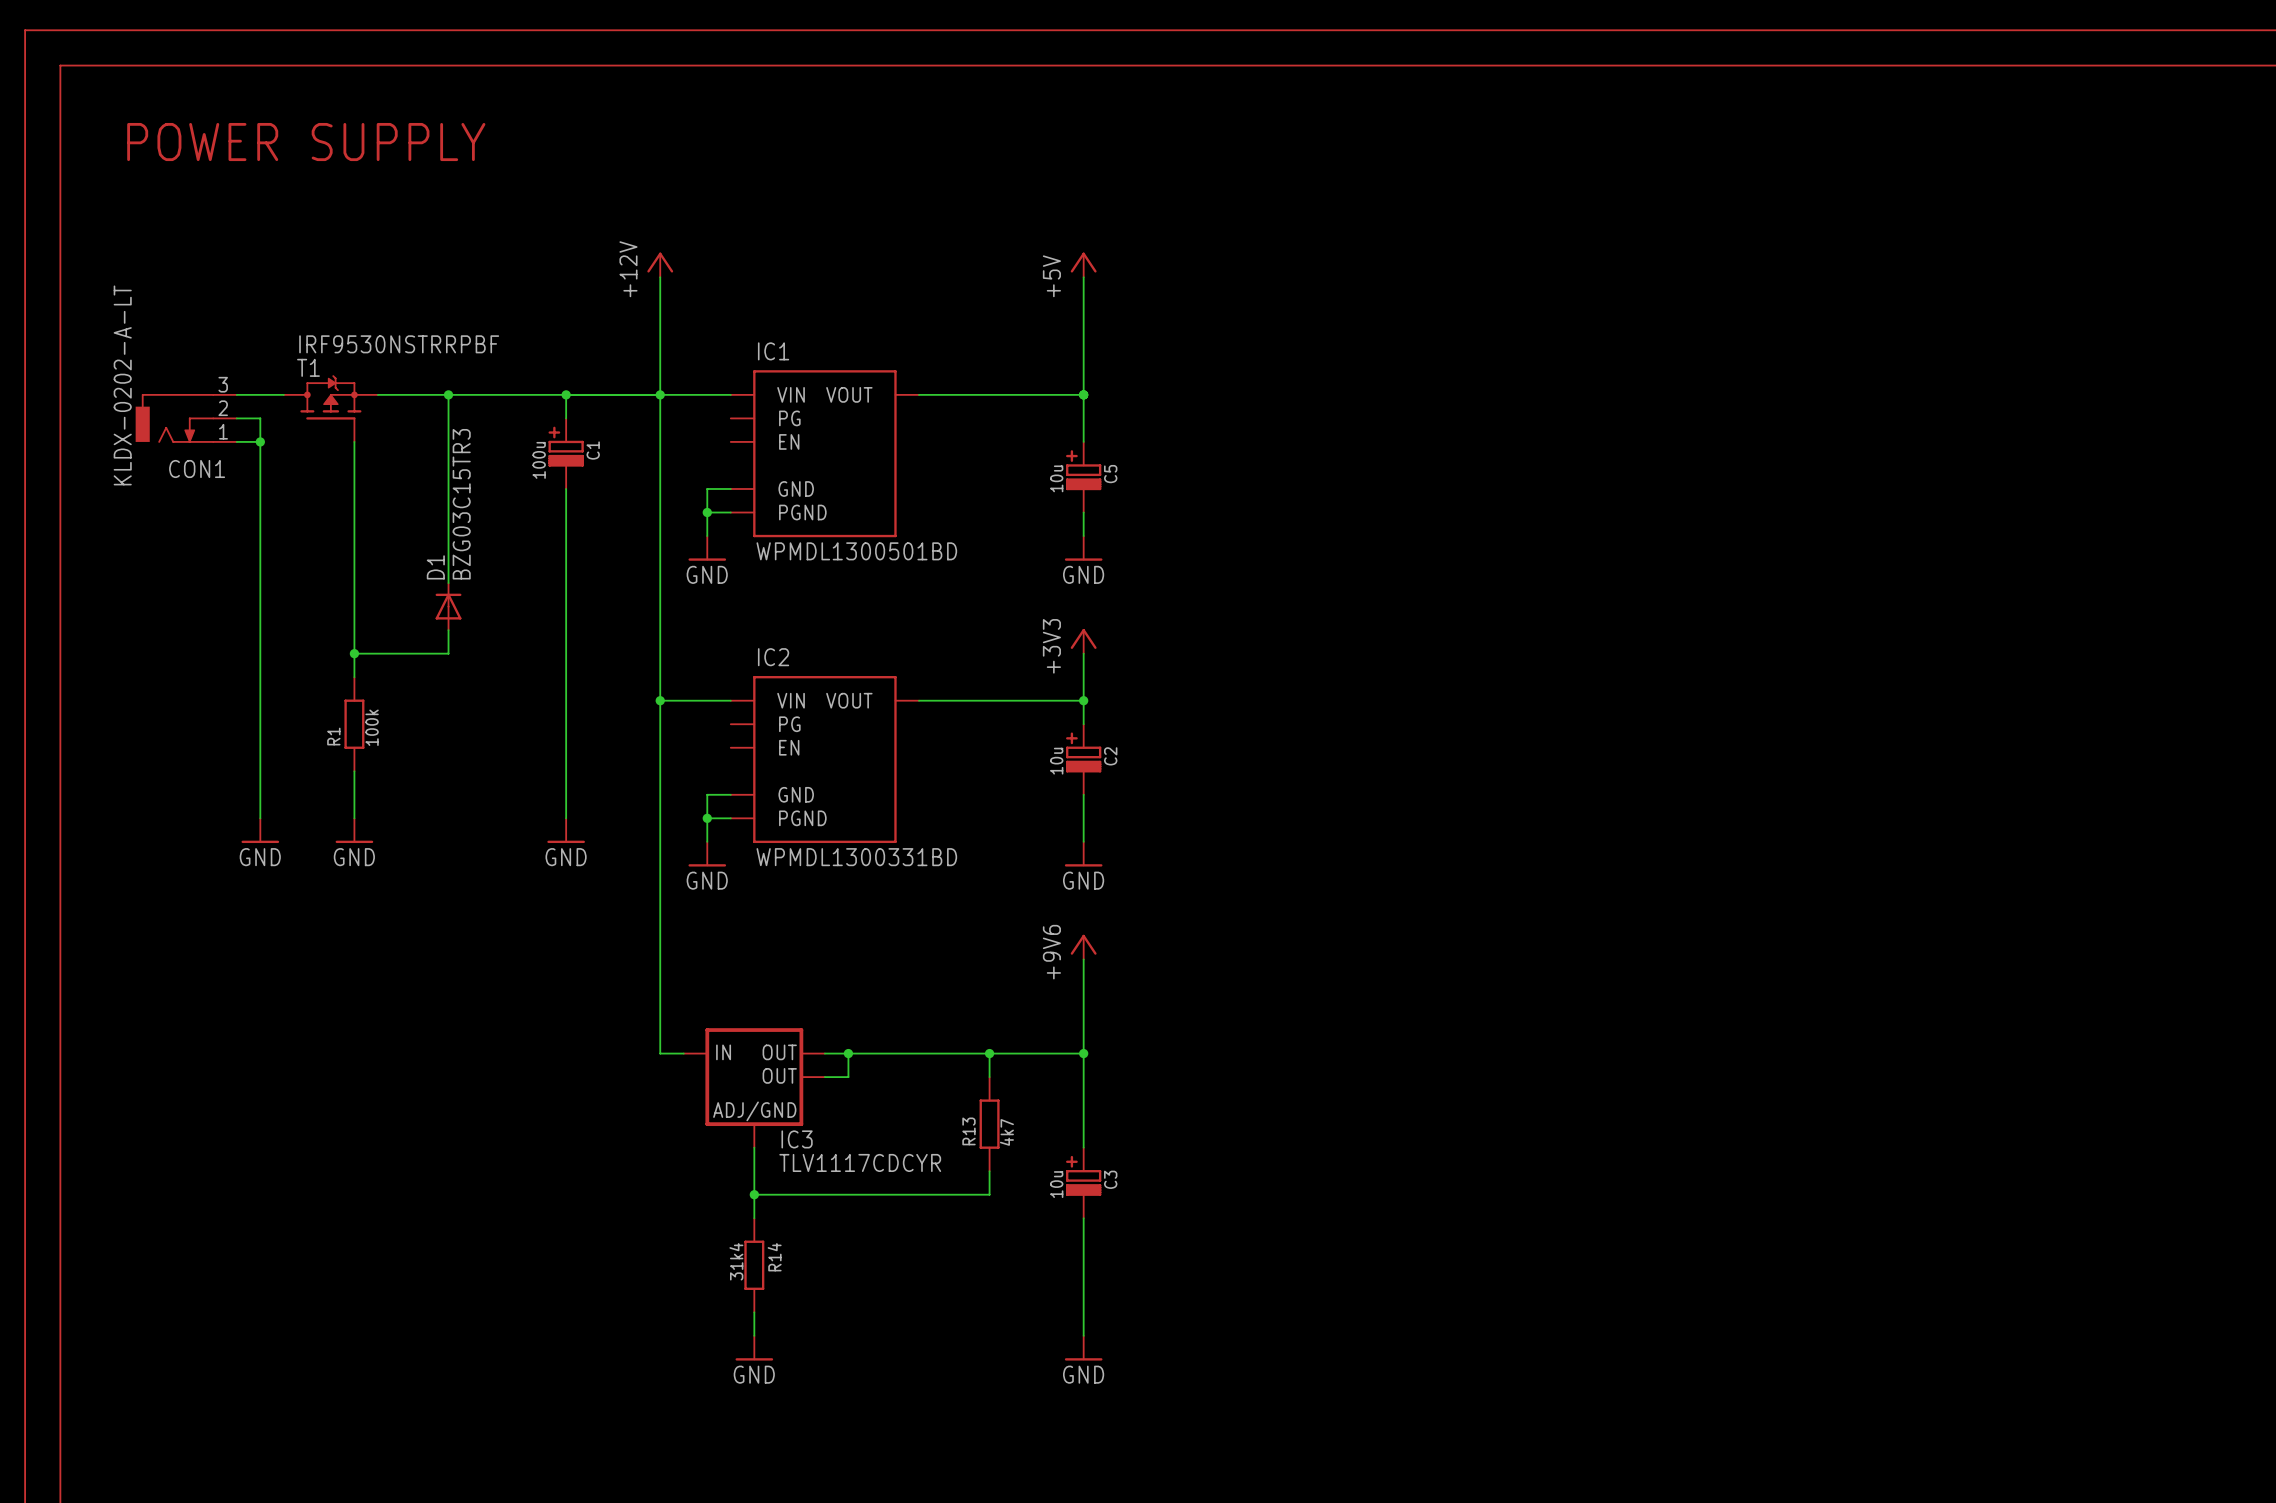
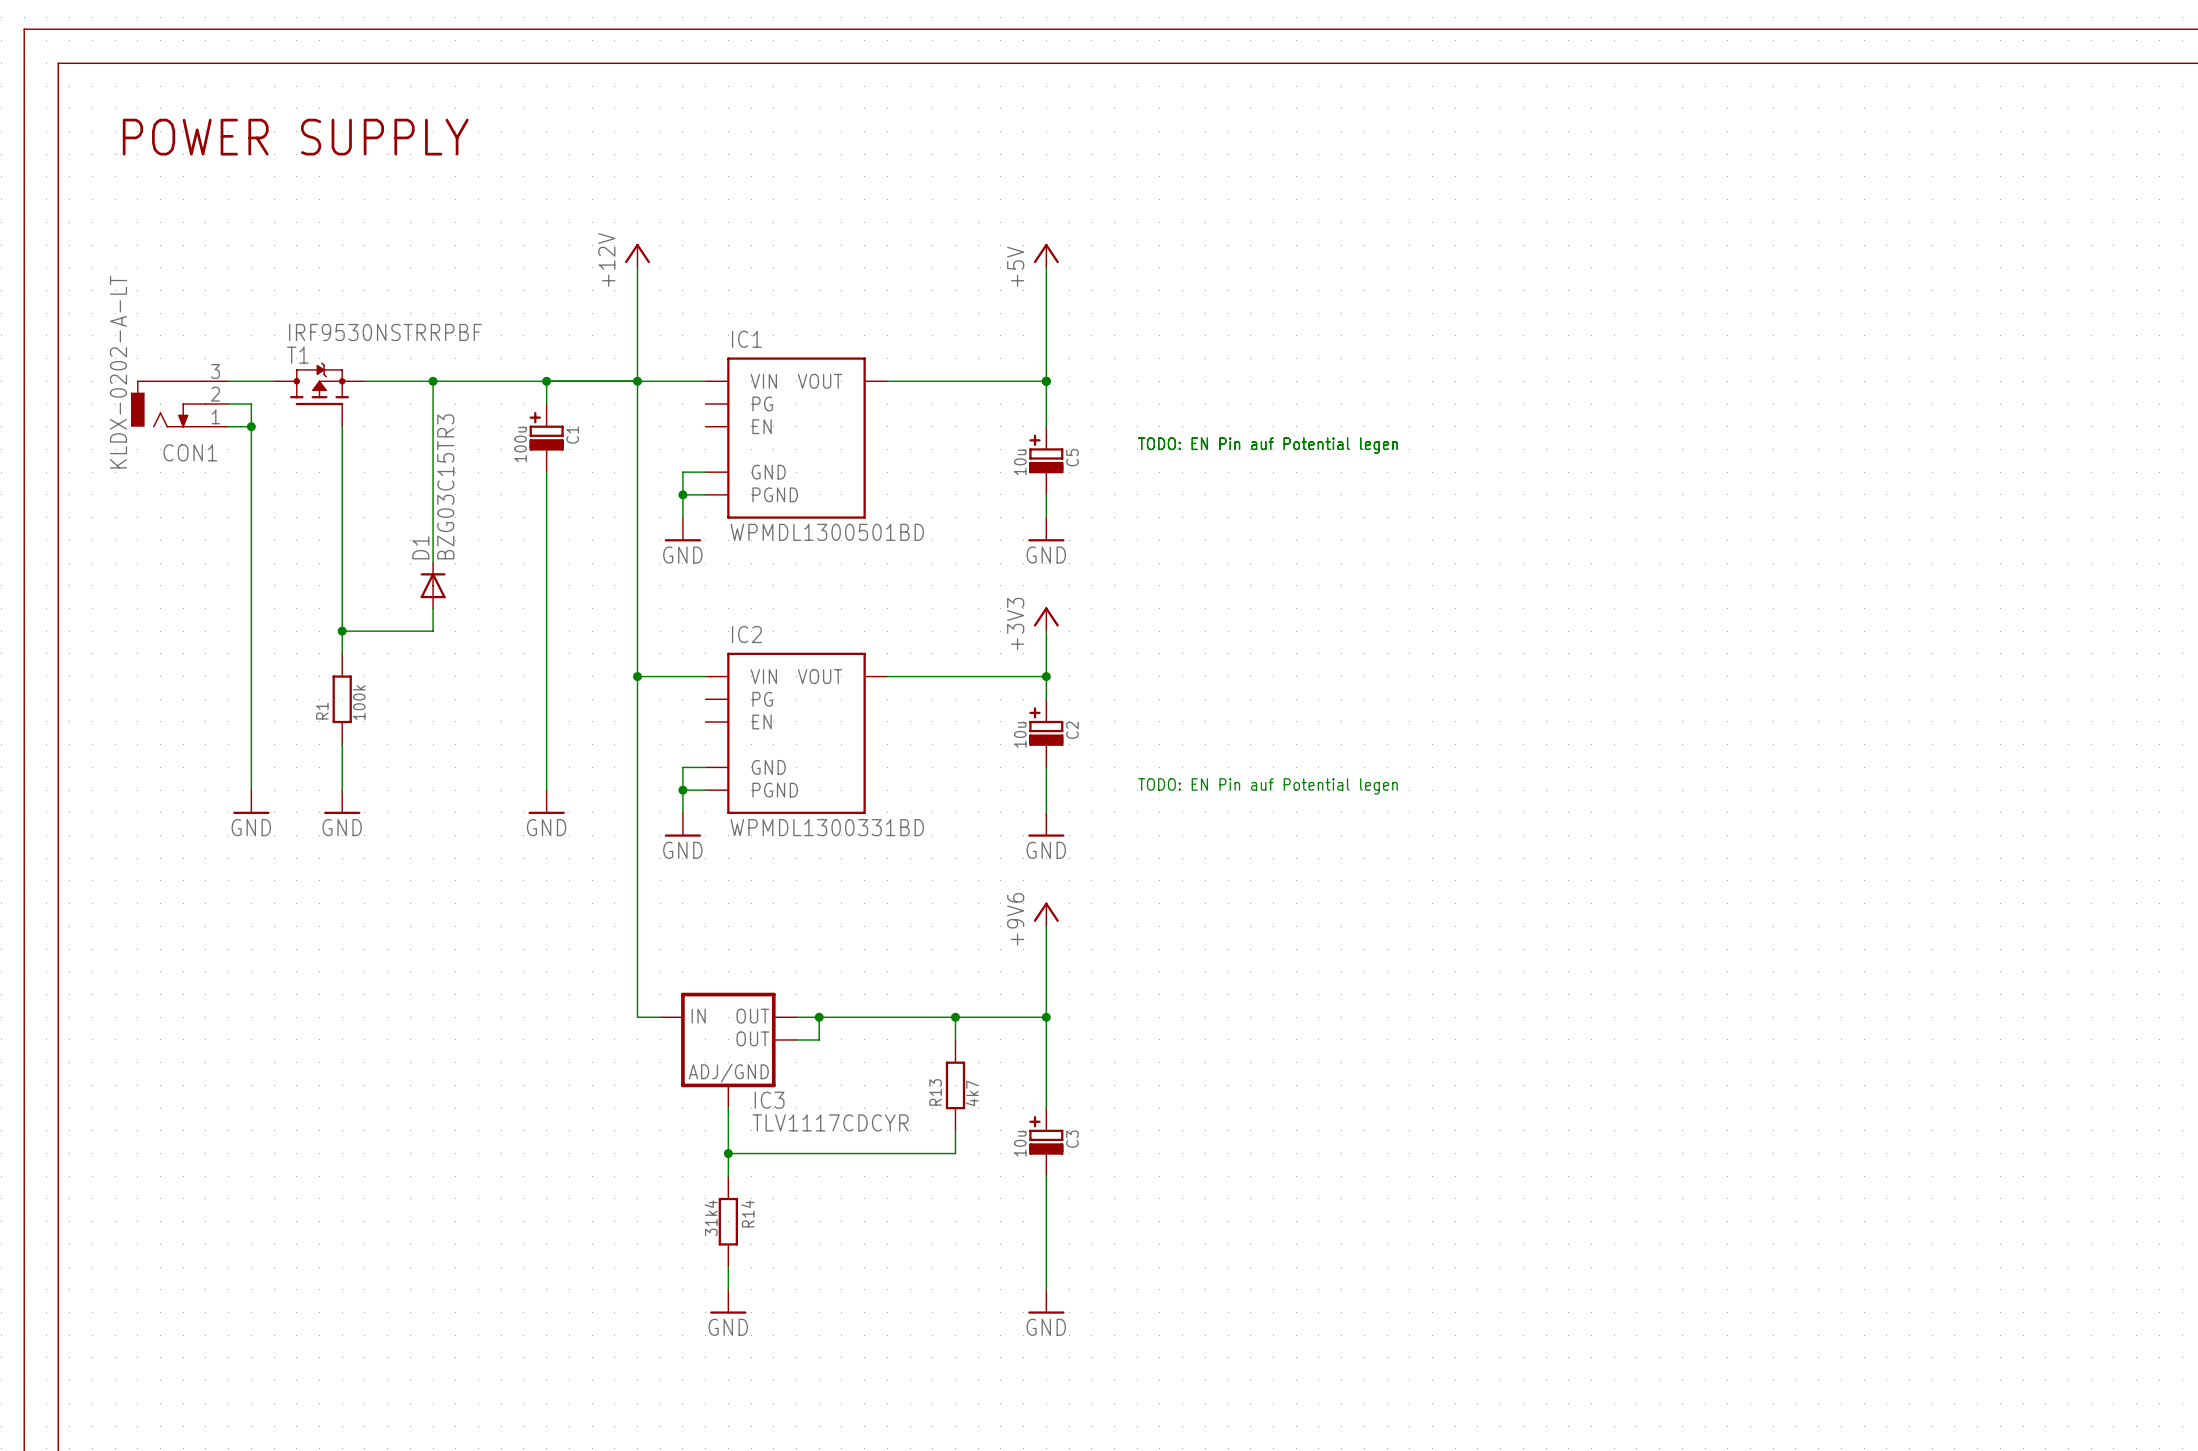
text: none -> TODO: EN Pin auf Potential legen (1267, 445)
text: none -> TODO: EN Pin auf Potential legen (1267, 786)

